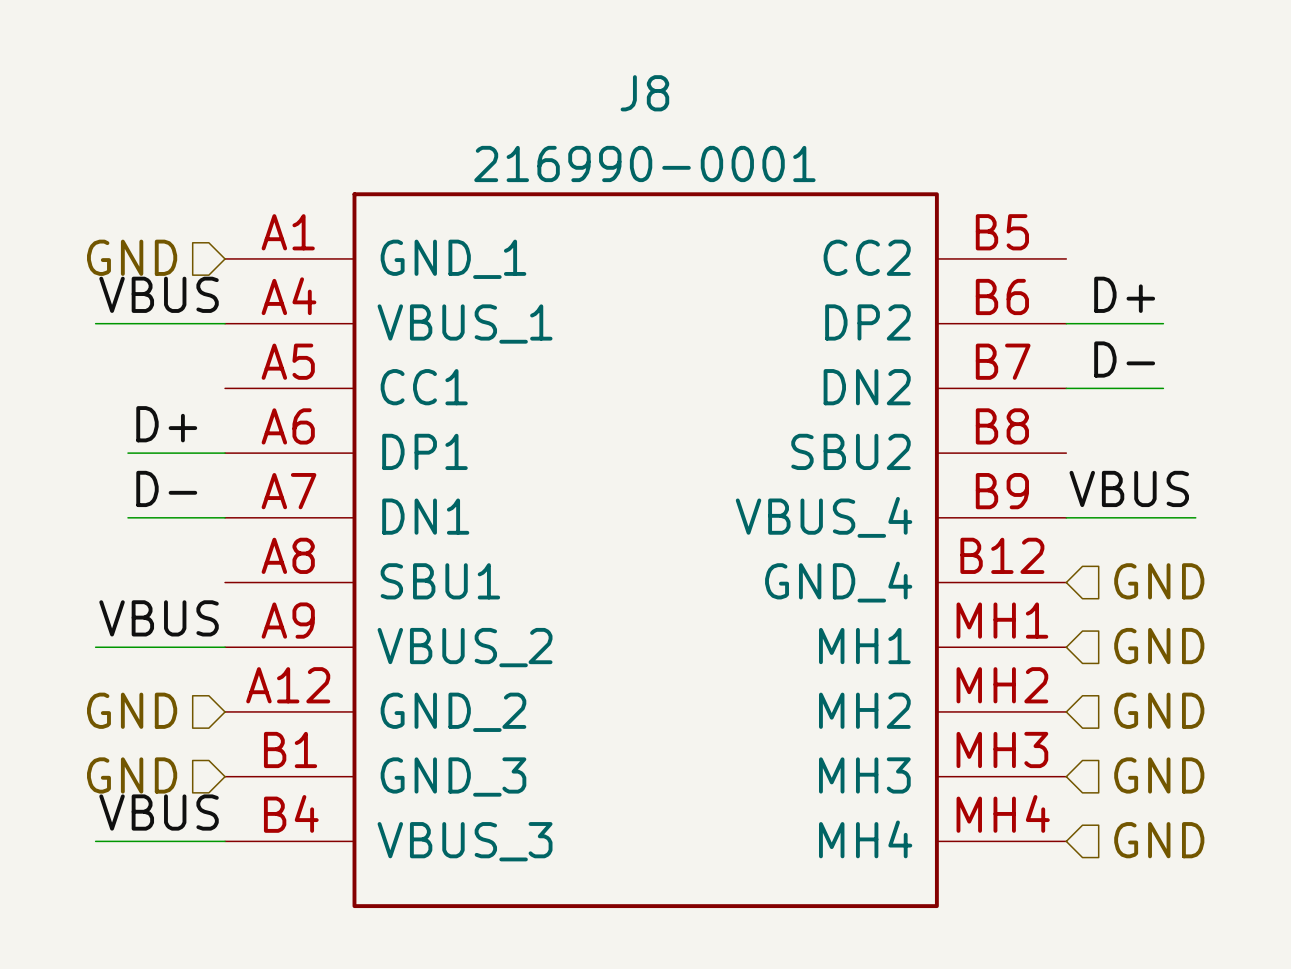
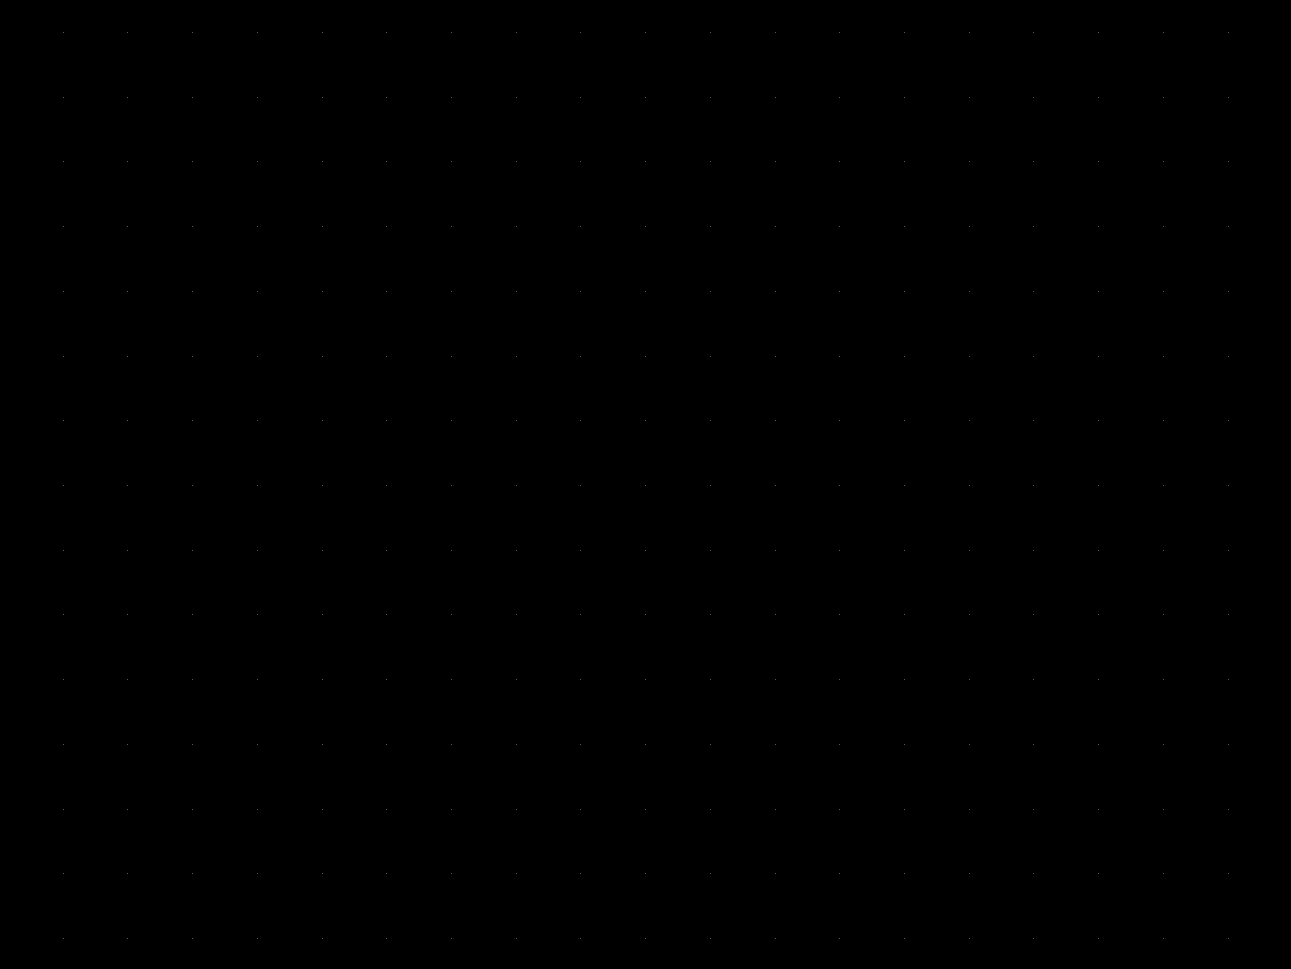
hierarchical label: GND (132, 257) -> none
label: VBUS (159, 294) -> none
label: D+ (1124, 294) -> none
wire: (95, 323) (225, 323) -> none
wire: (1066, 323) (1163, 323) -> none
label: D- (1124, 359) -> none
wire: (1066, 388) (1163, 388) -> none
label: D+ (166, 424) -> none
wire: (127, 453) (225, 453) -> none
label: D- (166, 488) -> none
label: VBUS (1129, 488) -> none
wire: (127, 517) (225, 517) -> none
wire: (1066, 517) (1195, 517) -> none
J8: 216990-0001 (645, 550) -> none
hierarchical label: GND (1159, 581) -> none
label: VBUS (159, 618) -> none
hierarchical label: GND (1159, 646) -> none
wire: (95, 647) (225, 647) -> none
hierarchical label: GND (132, 710) -> none
hierarchical label: GND (1159, 710) -> none
hierarchical label: GND (132, 775) -> none
hierarchical label: GND (1159, 775) -> none
label: VBUS (159, 812) -> none
hierarchical label: GND (1159, 840) -> none
wire: (95, 841) (225, 841) -> none

